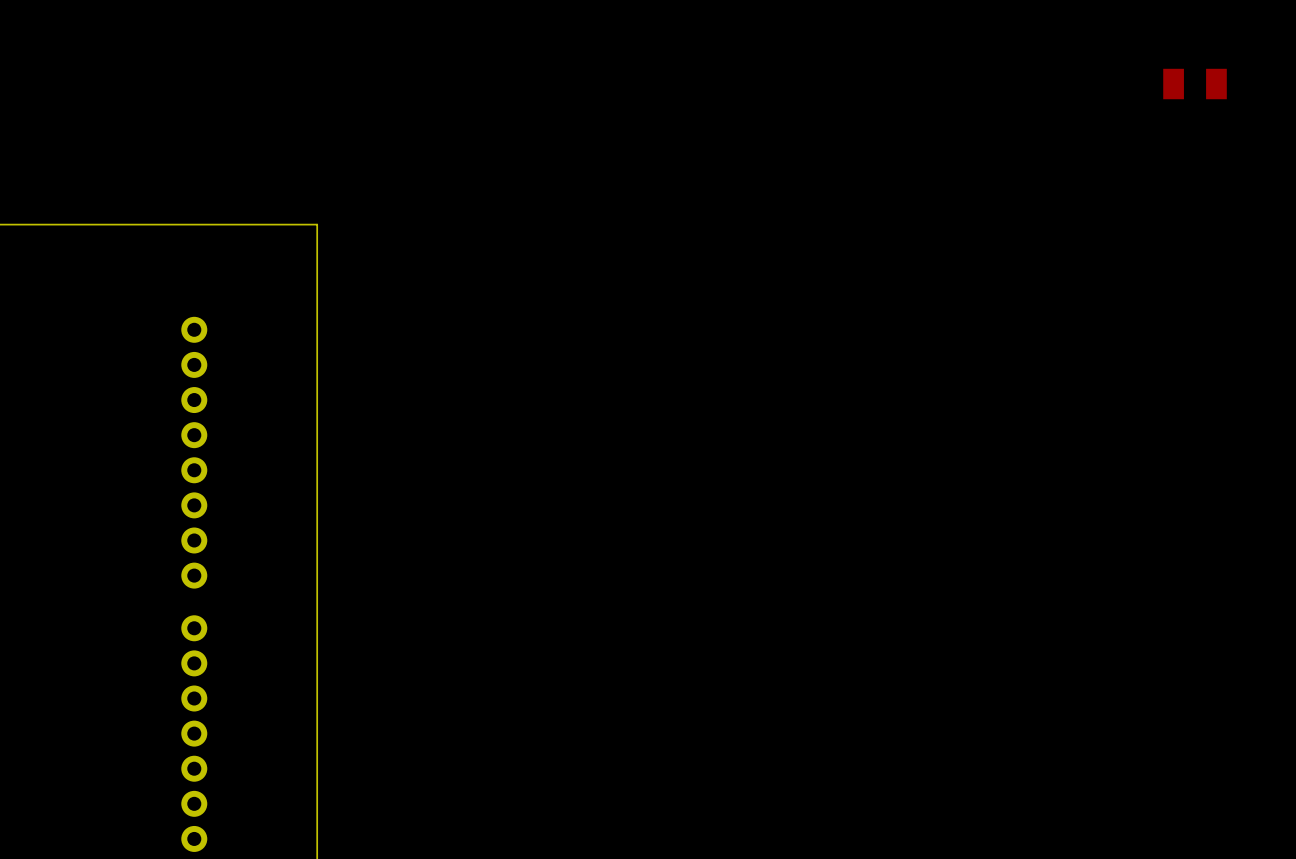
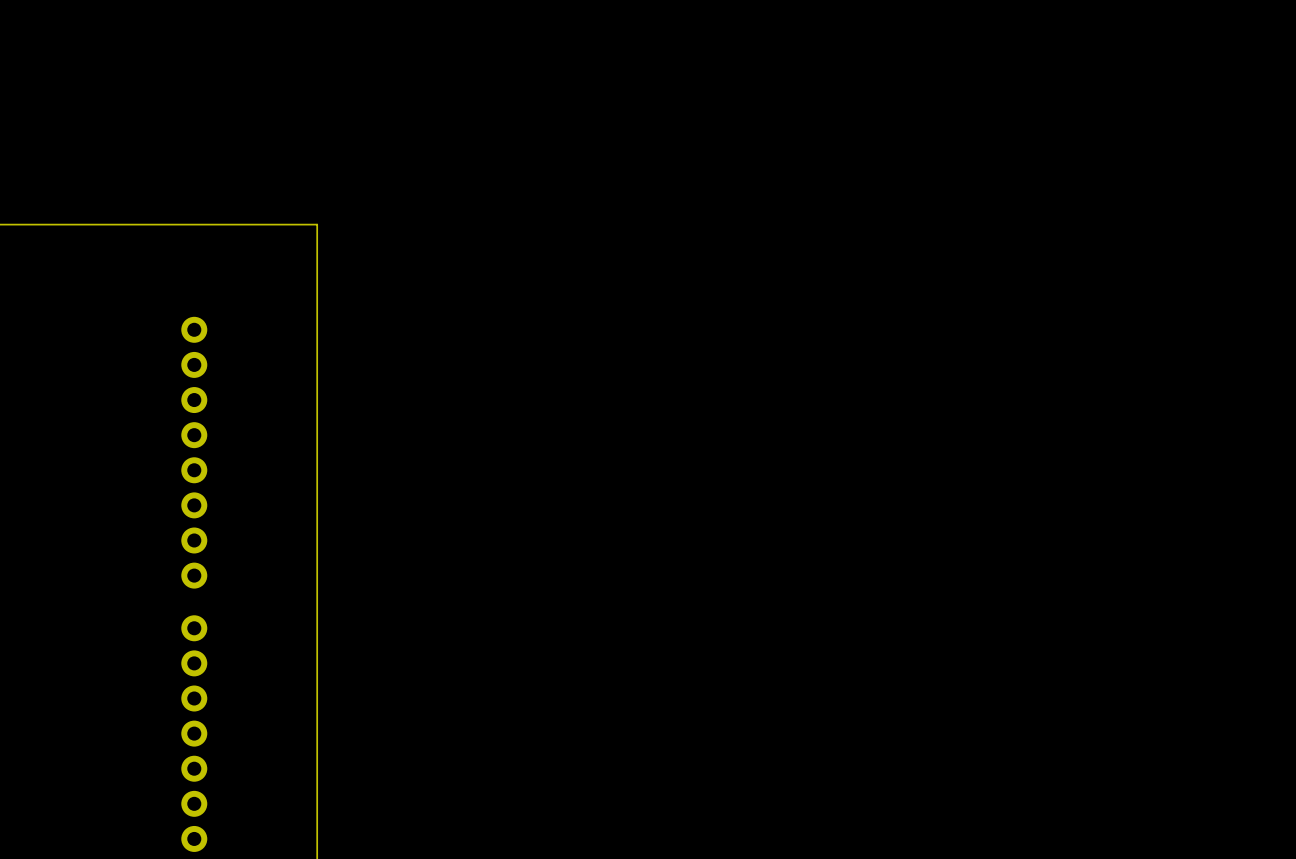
part: (1195, 84) -> none

